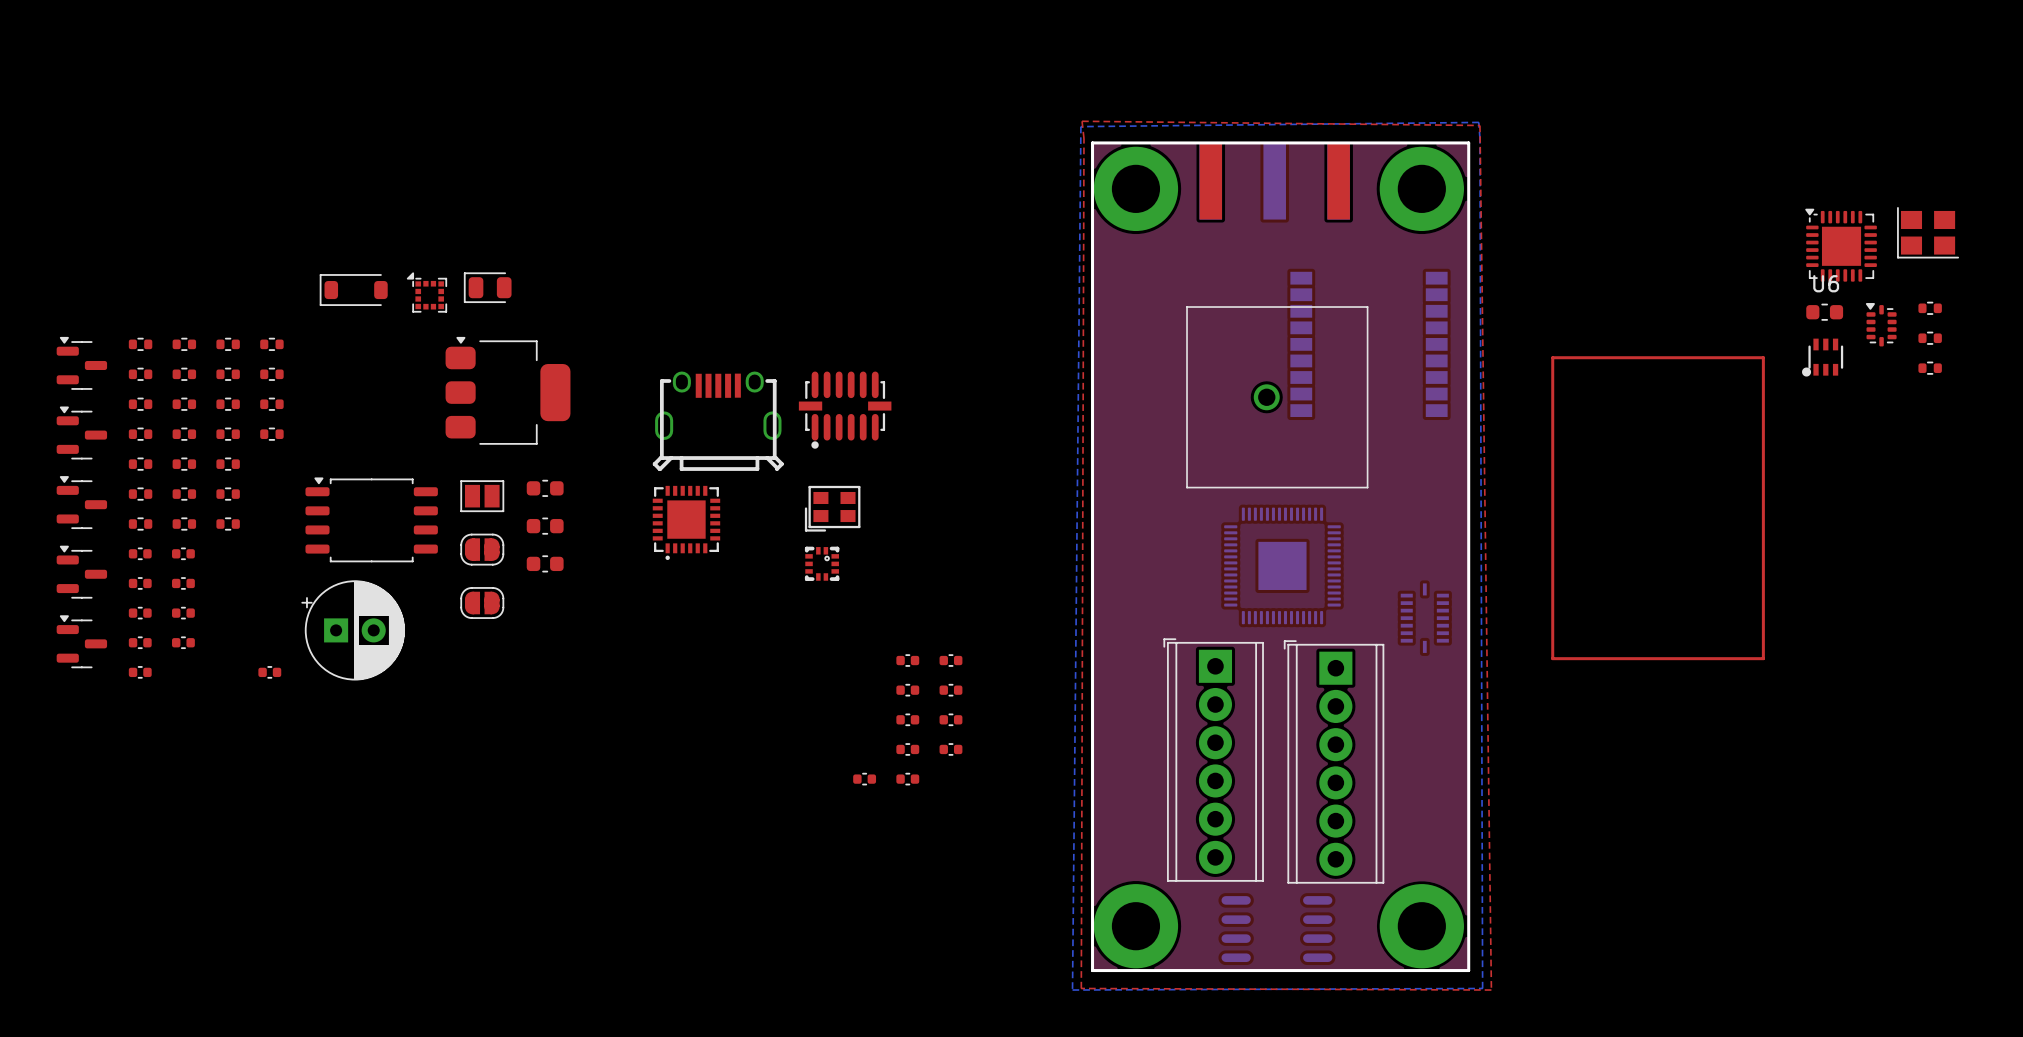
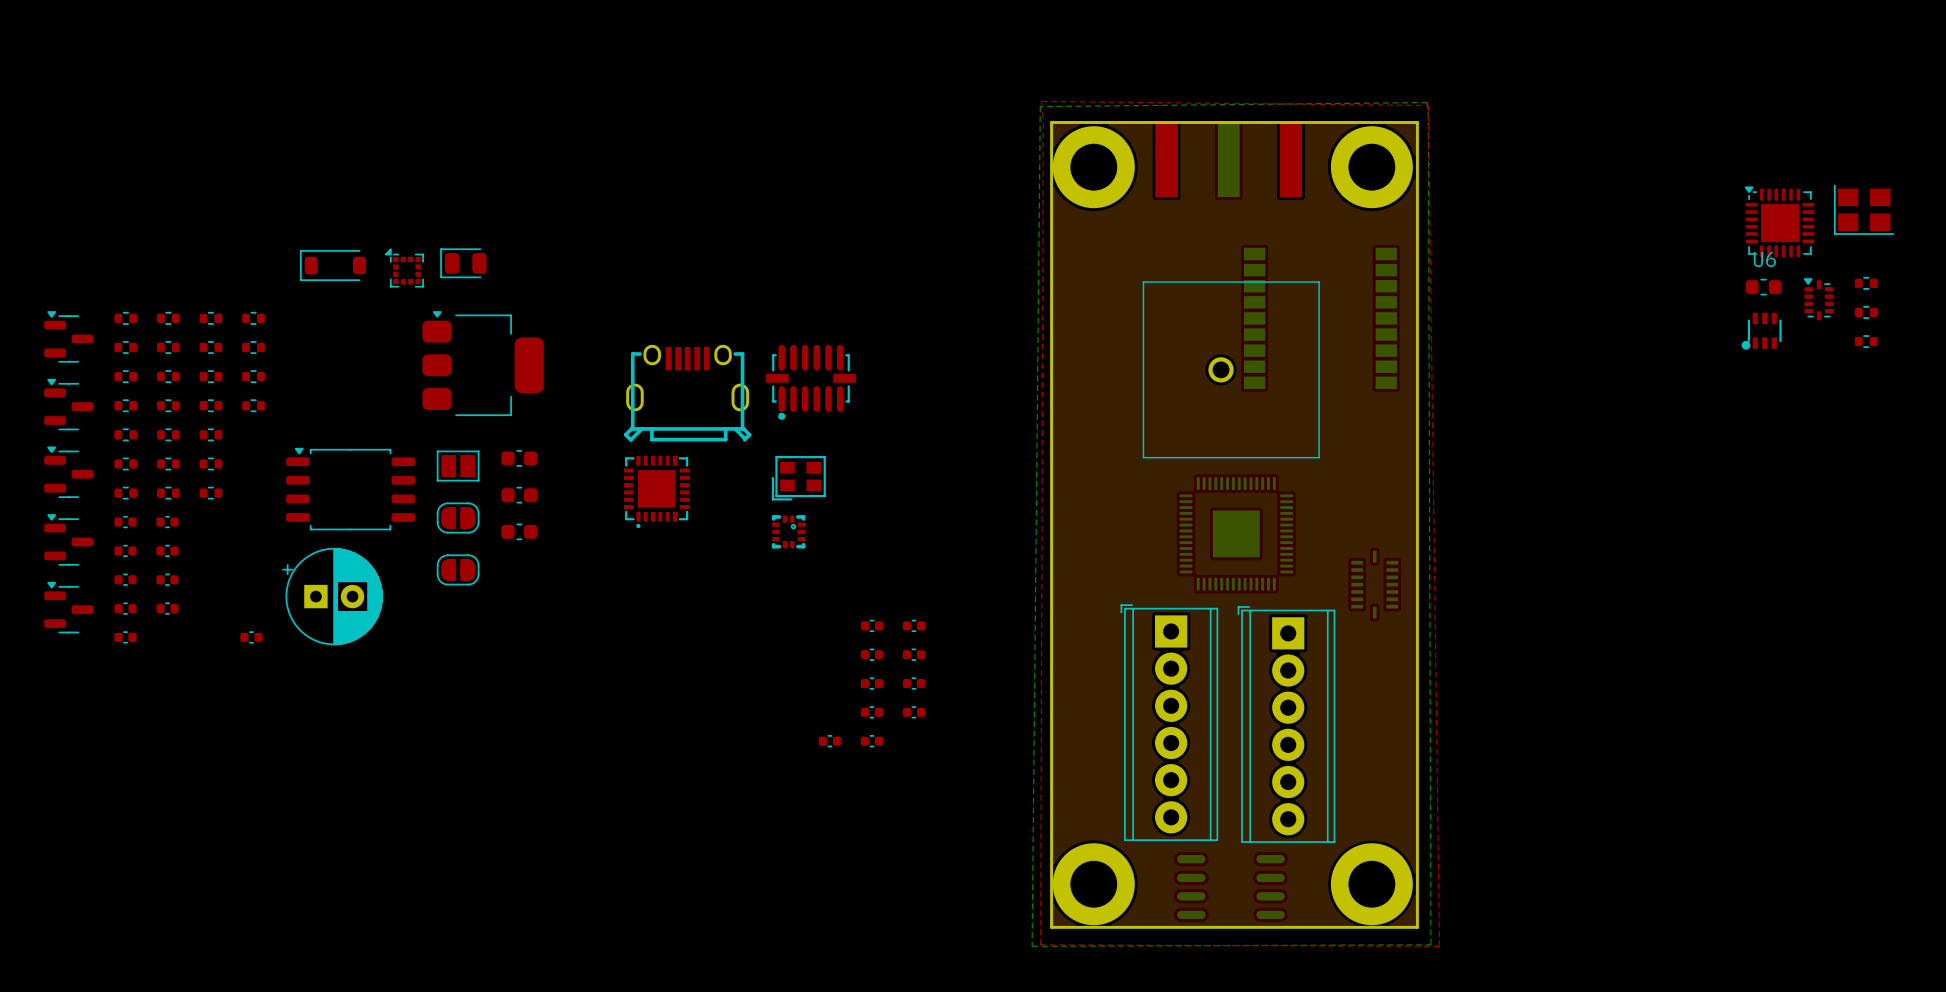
top track: (1552, 357) (1763, 357) (1763, 658) (1552, 658) (1552, 357) -> none

